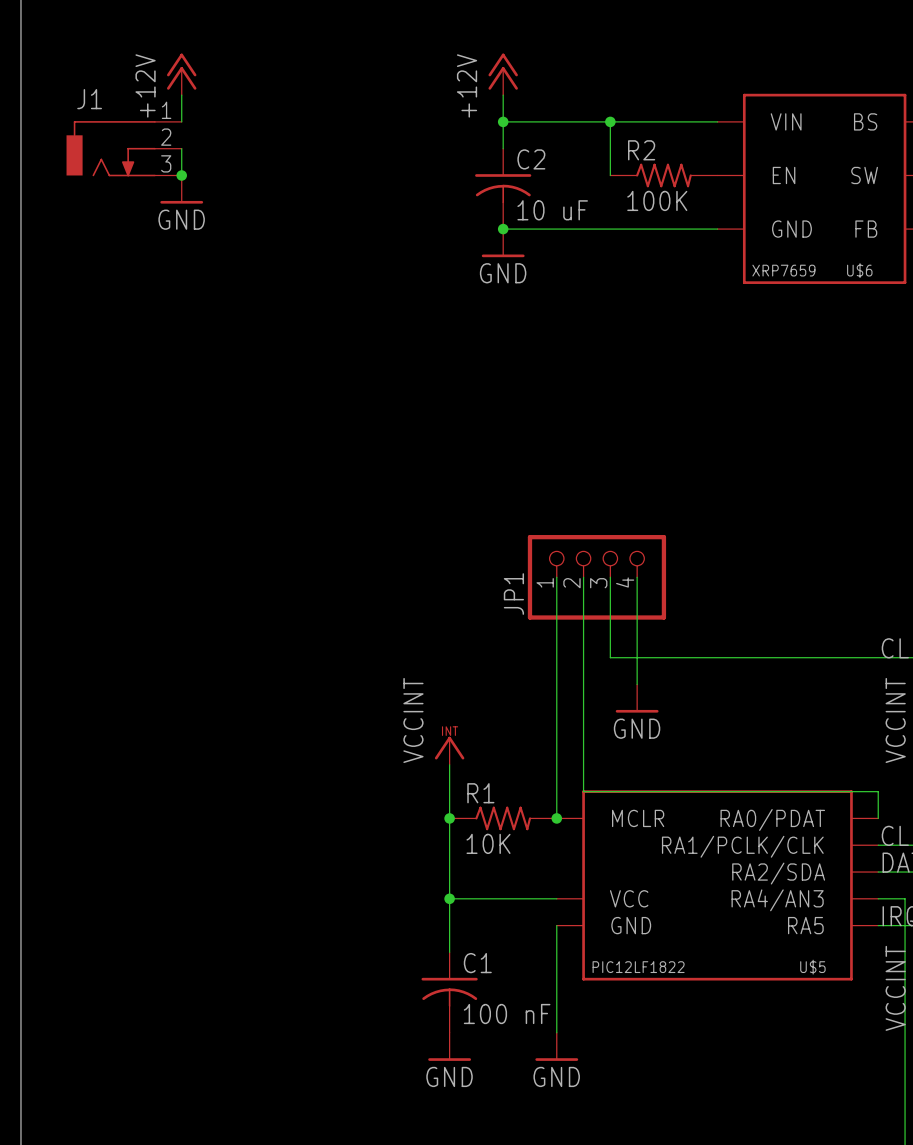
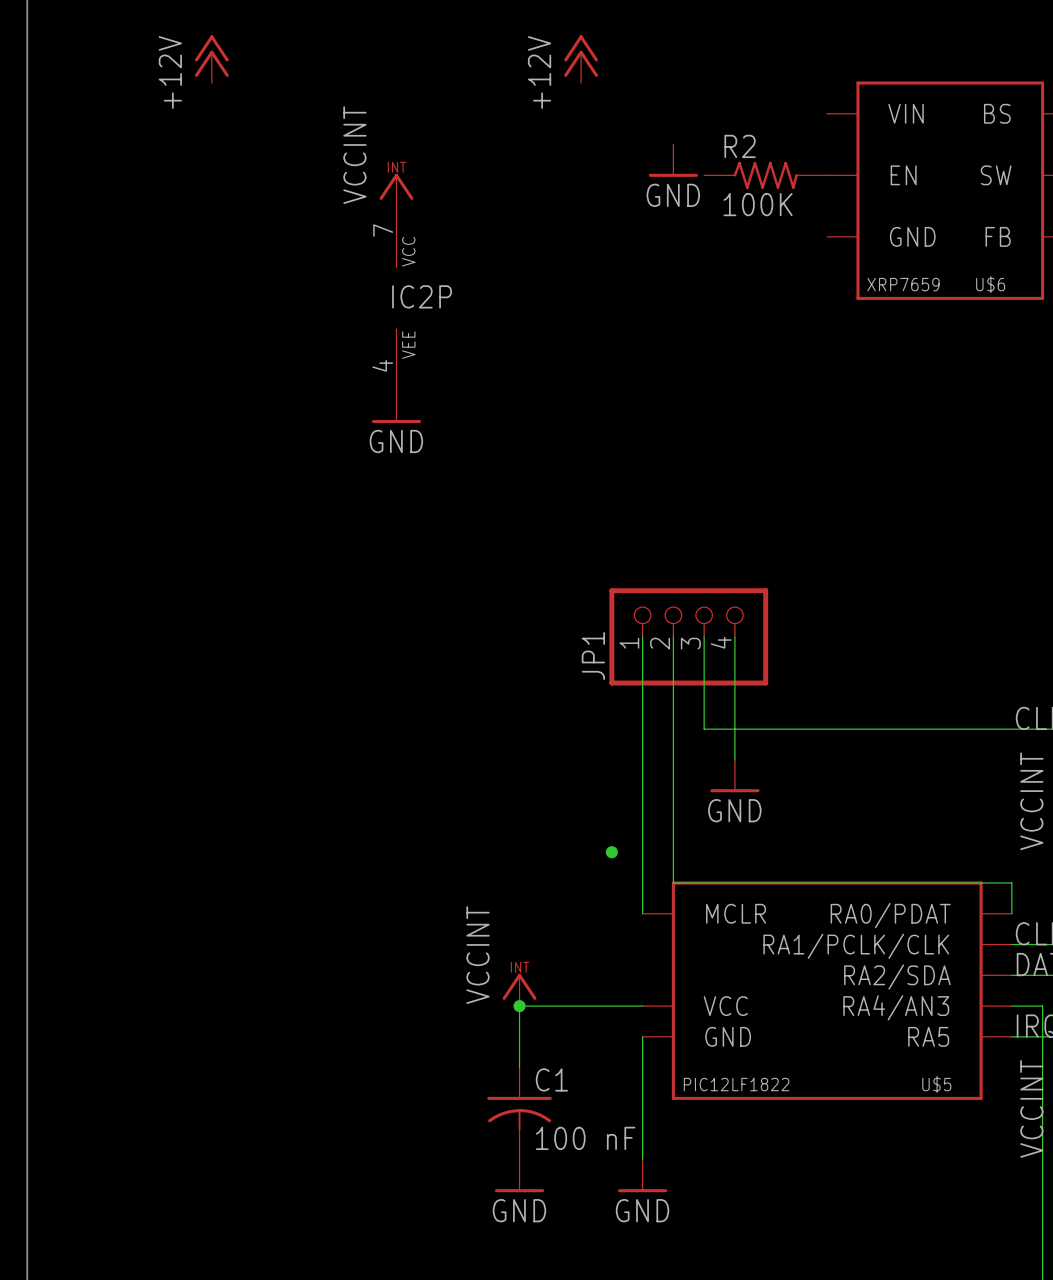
wire: (181, 95) (181, 121) -> none
wire: (503, 95) (503, 148) -> none
wire: (503, 121) (717, 121) -> none
junction: (503, 121) -> none
wire: (610, 121) (610, 175) -> none
junction: (610, 121) -> none
J1: (124, 148) -> none
wire: (181, 148) (181, 175) -> none
power symbol: none -> GND (673, 160)
junction: (181, 175) -> none
power symbol: none -> VCCINT (396, 189)
C2: 10 uF (503, 188) -> none
power symbol: GND (181, 189) -> none
wire: (503, 229) (717, 229) -> none
junction: (503, 229) -> none
power symbol: GND (503, 243) -> none
IC2P: none -> (396, 298)
power symbol: none -> GND (396, 406)
power symbol position: VCCINT (449, 750) -> VCCINT (519, 989)
wire: (449, 764) (449, 898) -> none
junction: none -> (611, 852)
junction: (449, 818) -> none
R1: 10K (503, 818) -> none
junction: (556, 818) -> none

